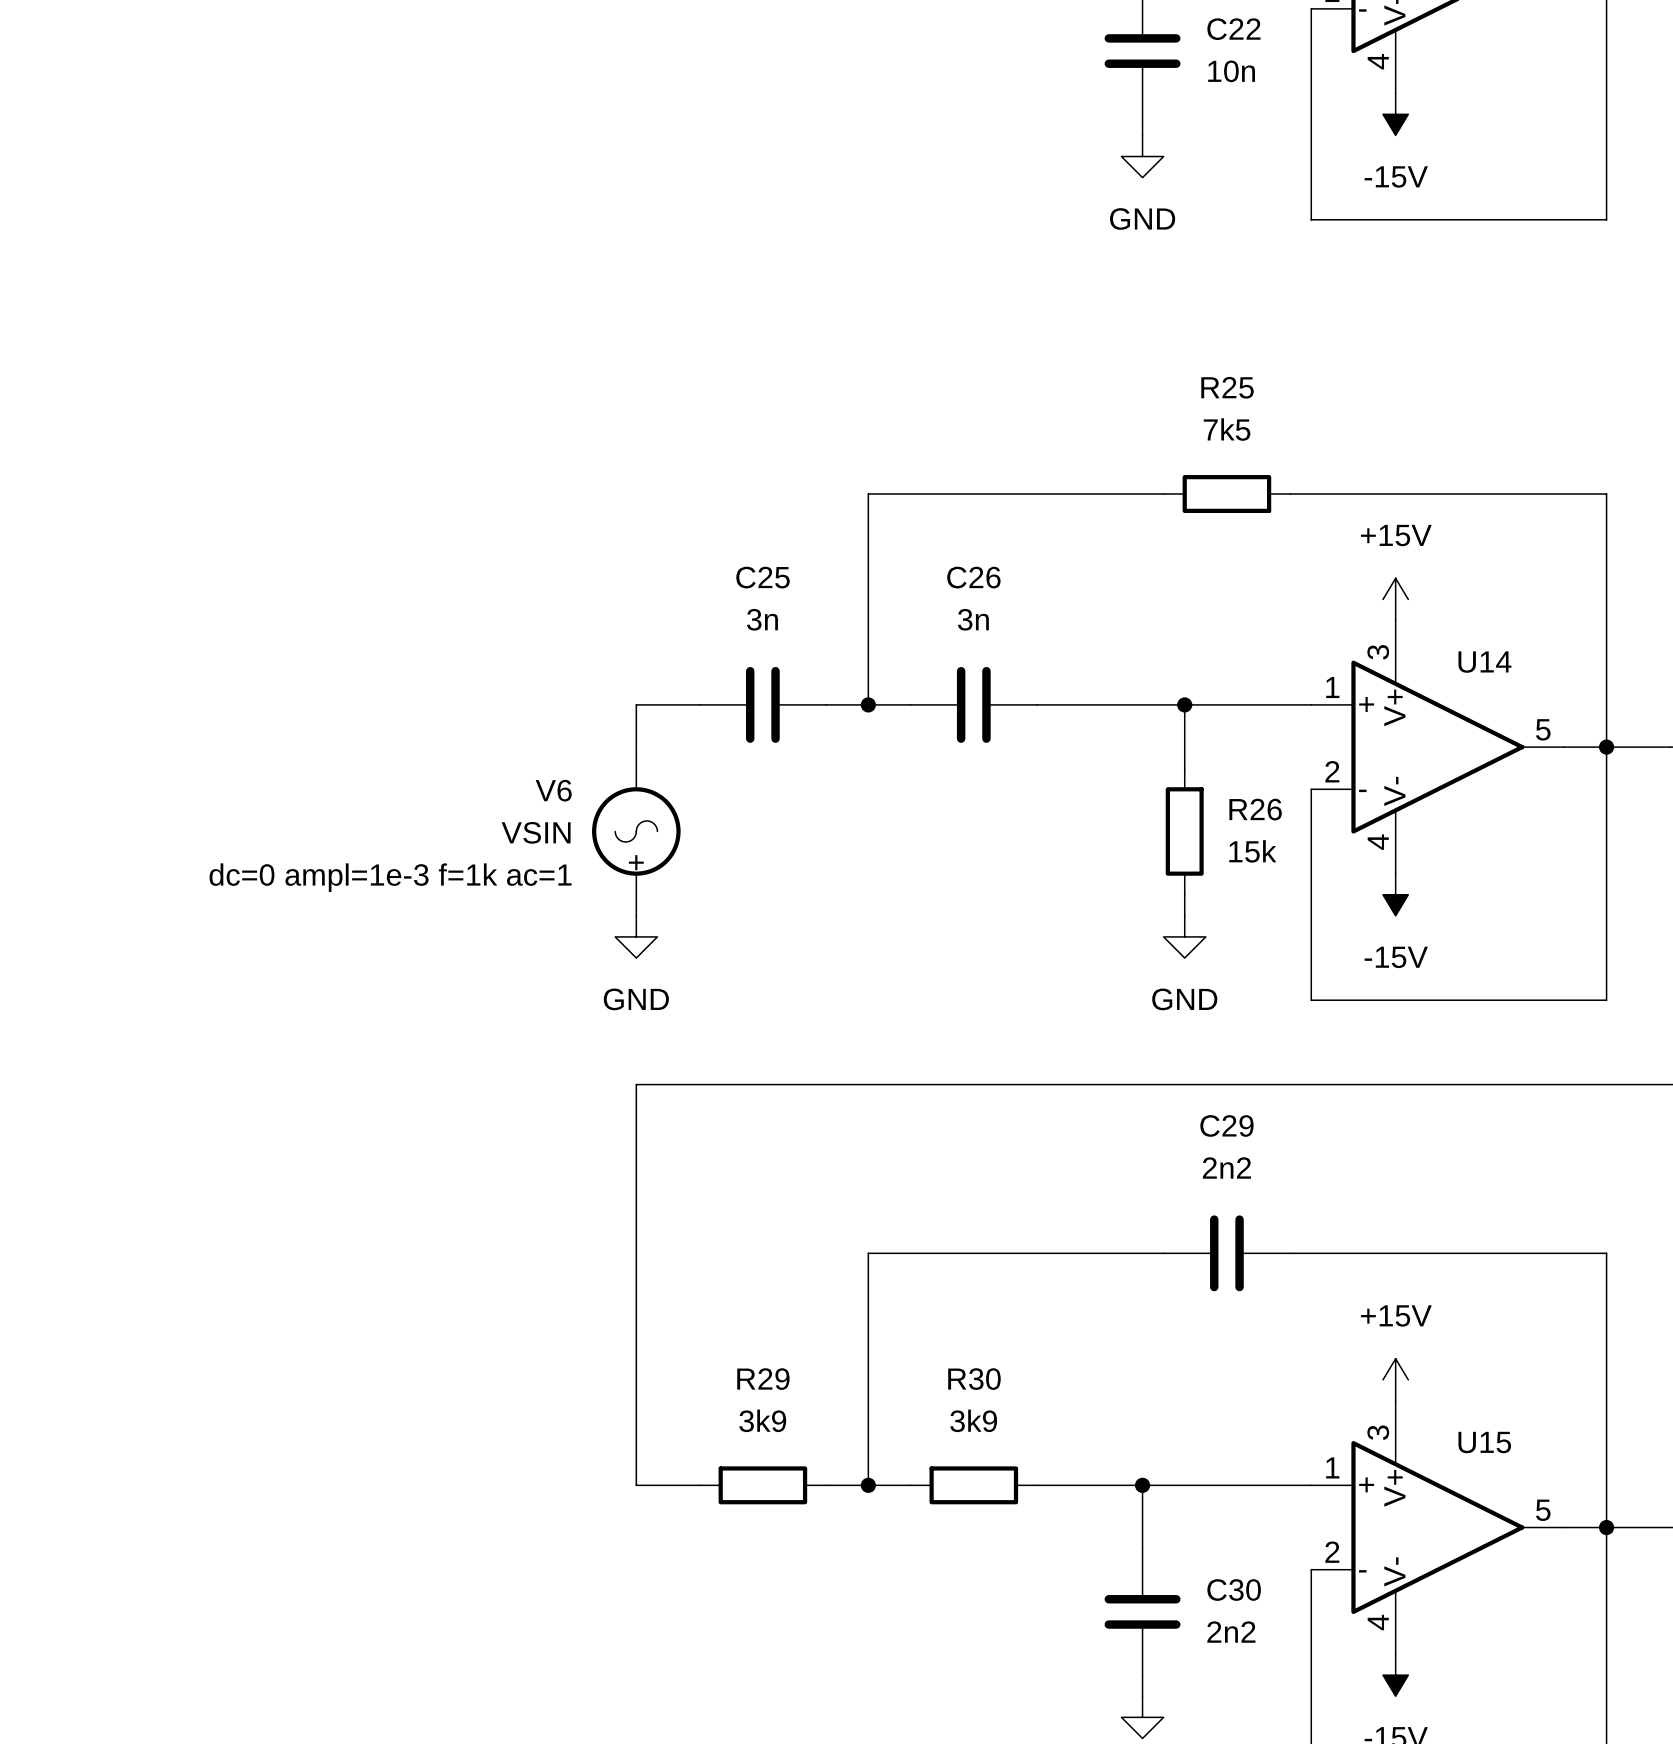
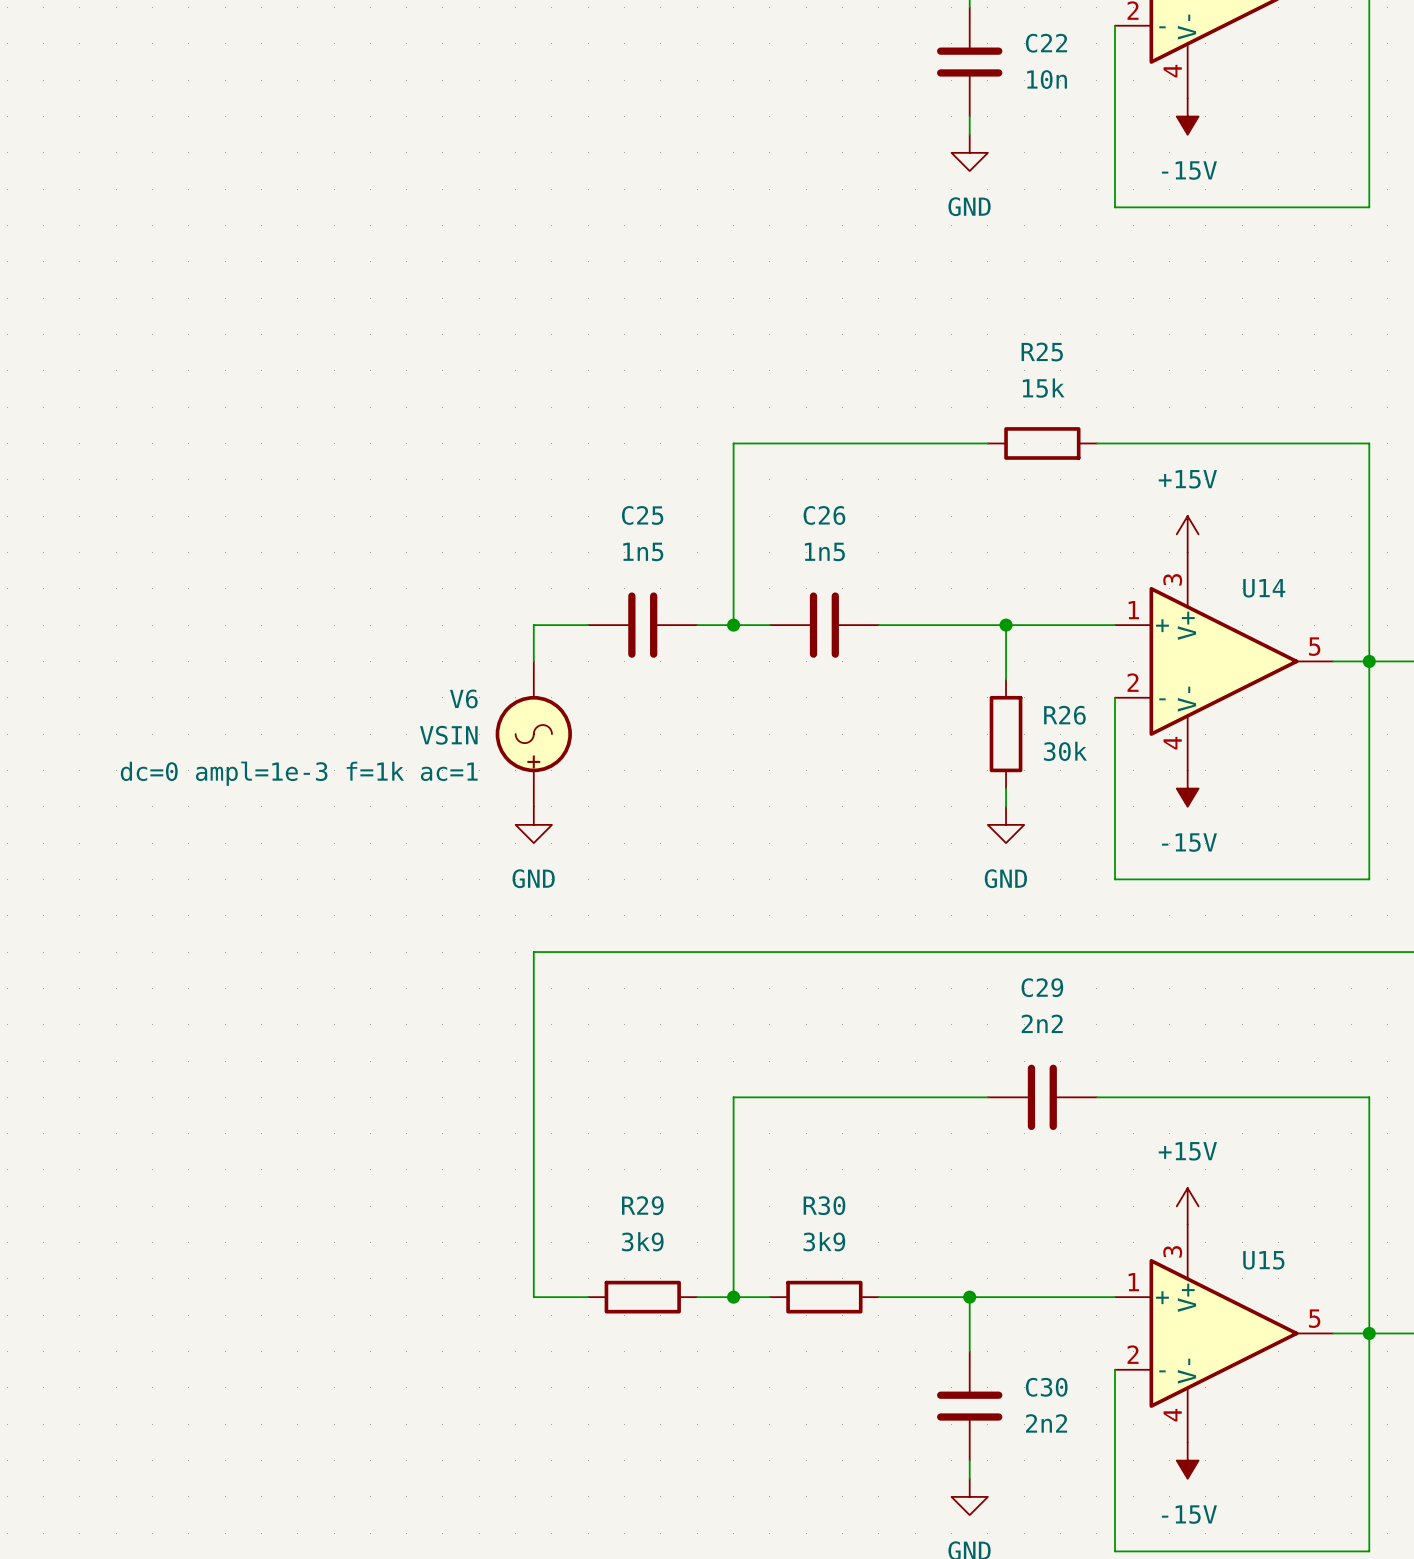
R25 value: 7k5 (1227, 429) -> 15k (1043, 388)
C25 value: 3n (762, 619) -> 1n5 (643, 551)
C26 value: 3n (973, 619) -> 1n5 (824, 551)
R26 value: 15k (1252, 851) -> 30k (1065, 751)

